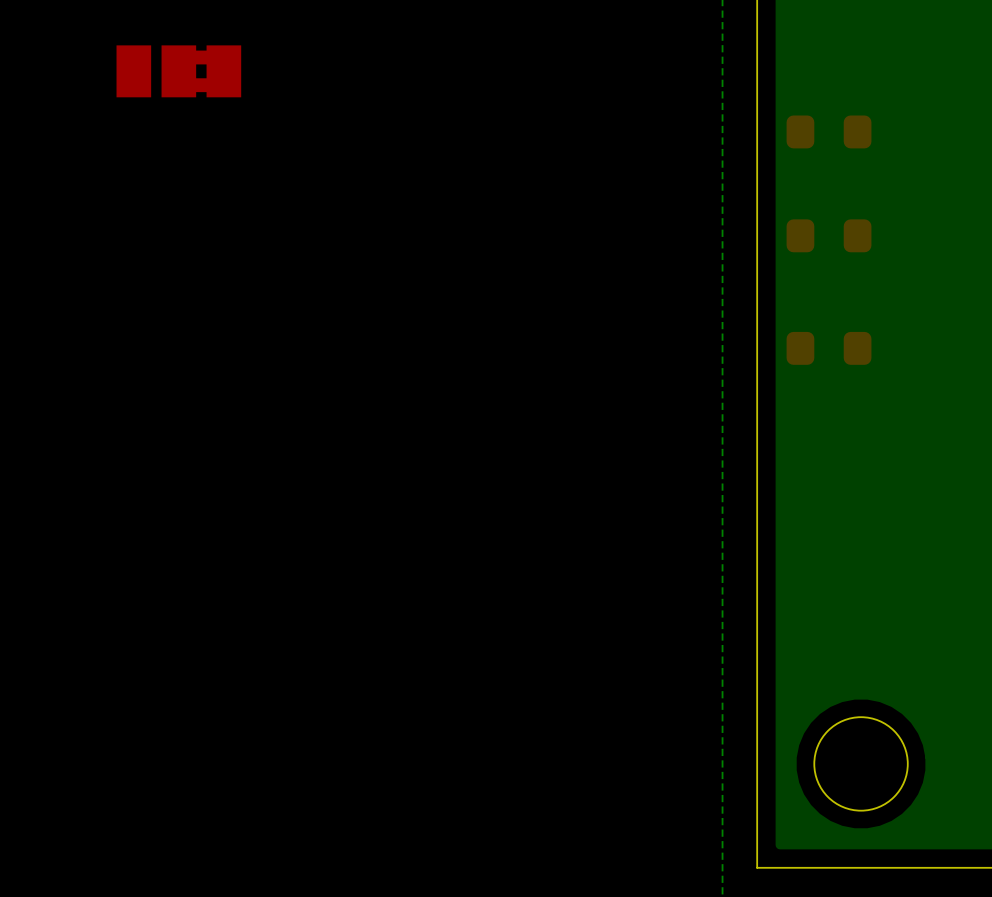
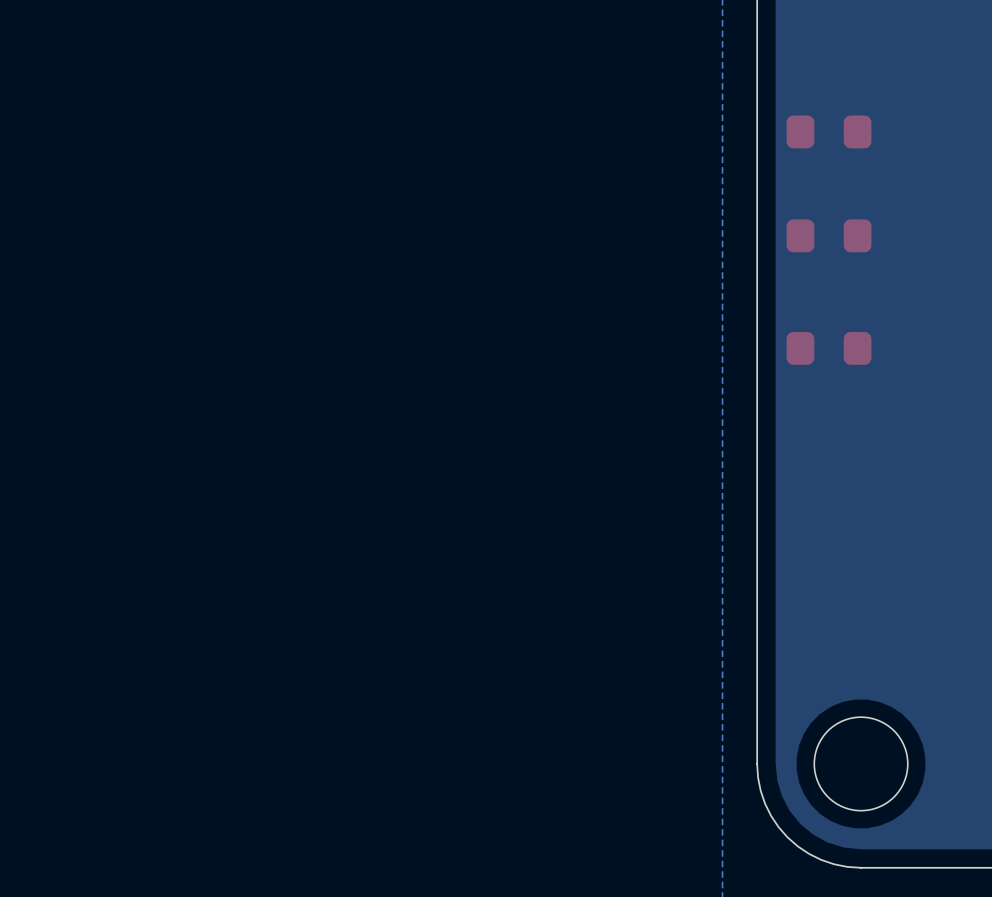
part: (178, 71) -> none
board edge: (757, 763) (757, 867) (861, 867) -> (757, 763) (758, 777) (765, 803) (778, 827) (787, 837) (797, 846) (821, 859) (847, 866) (861, 867)

